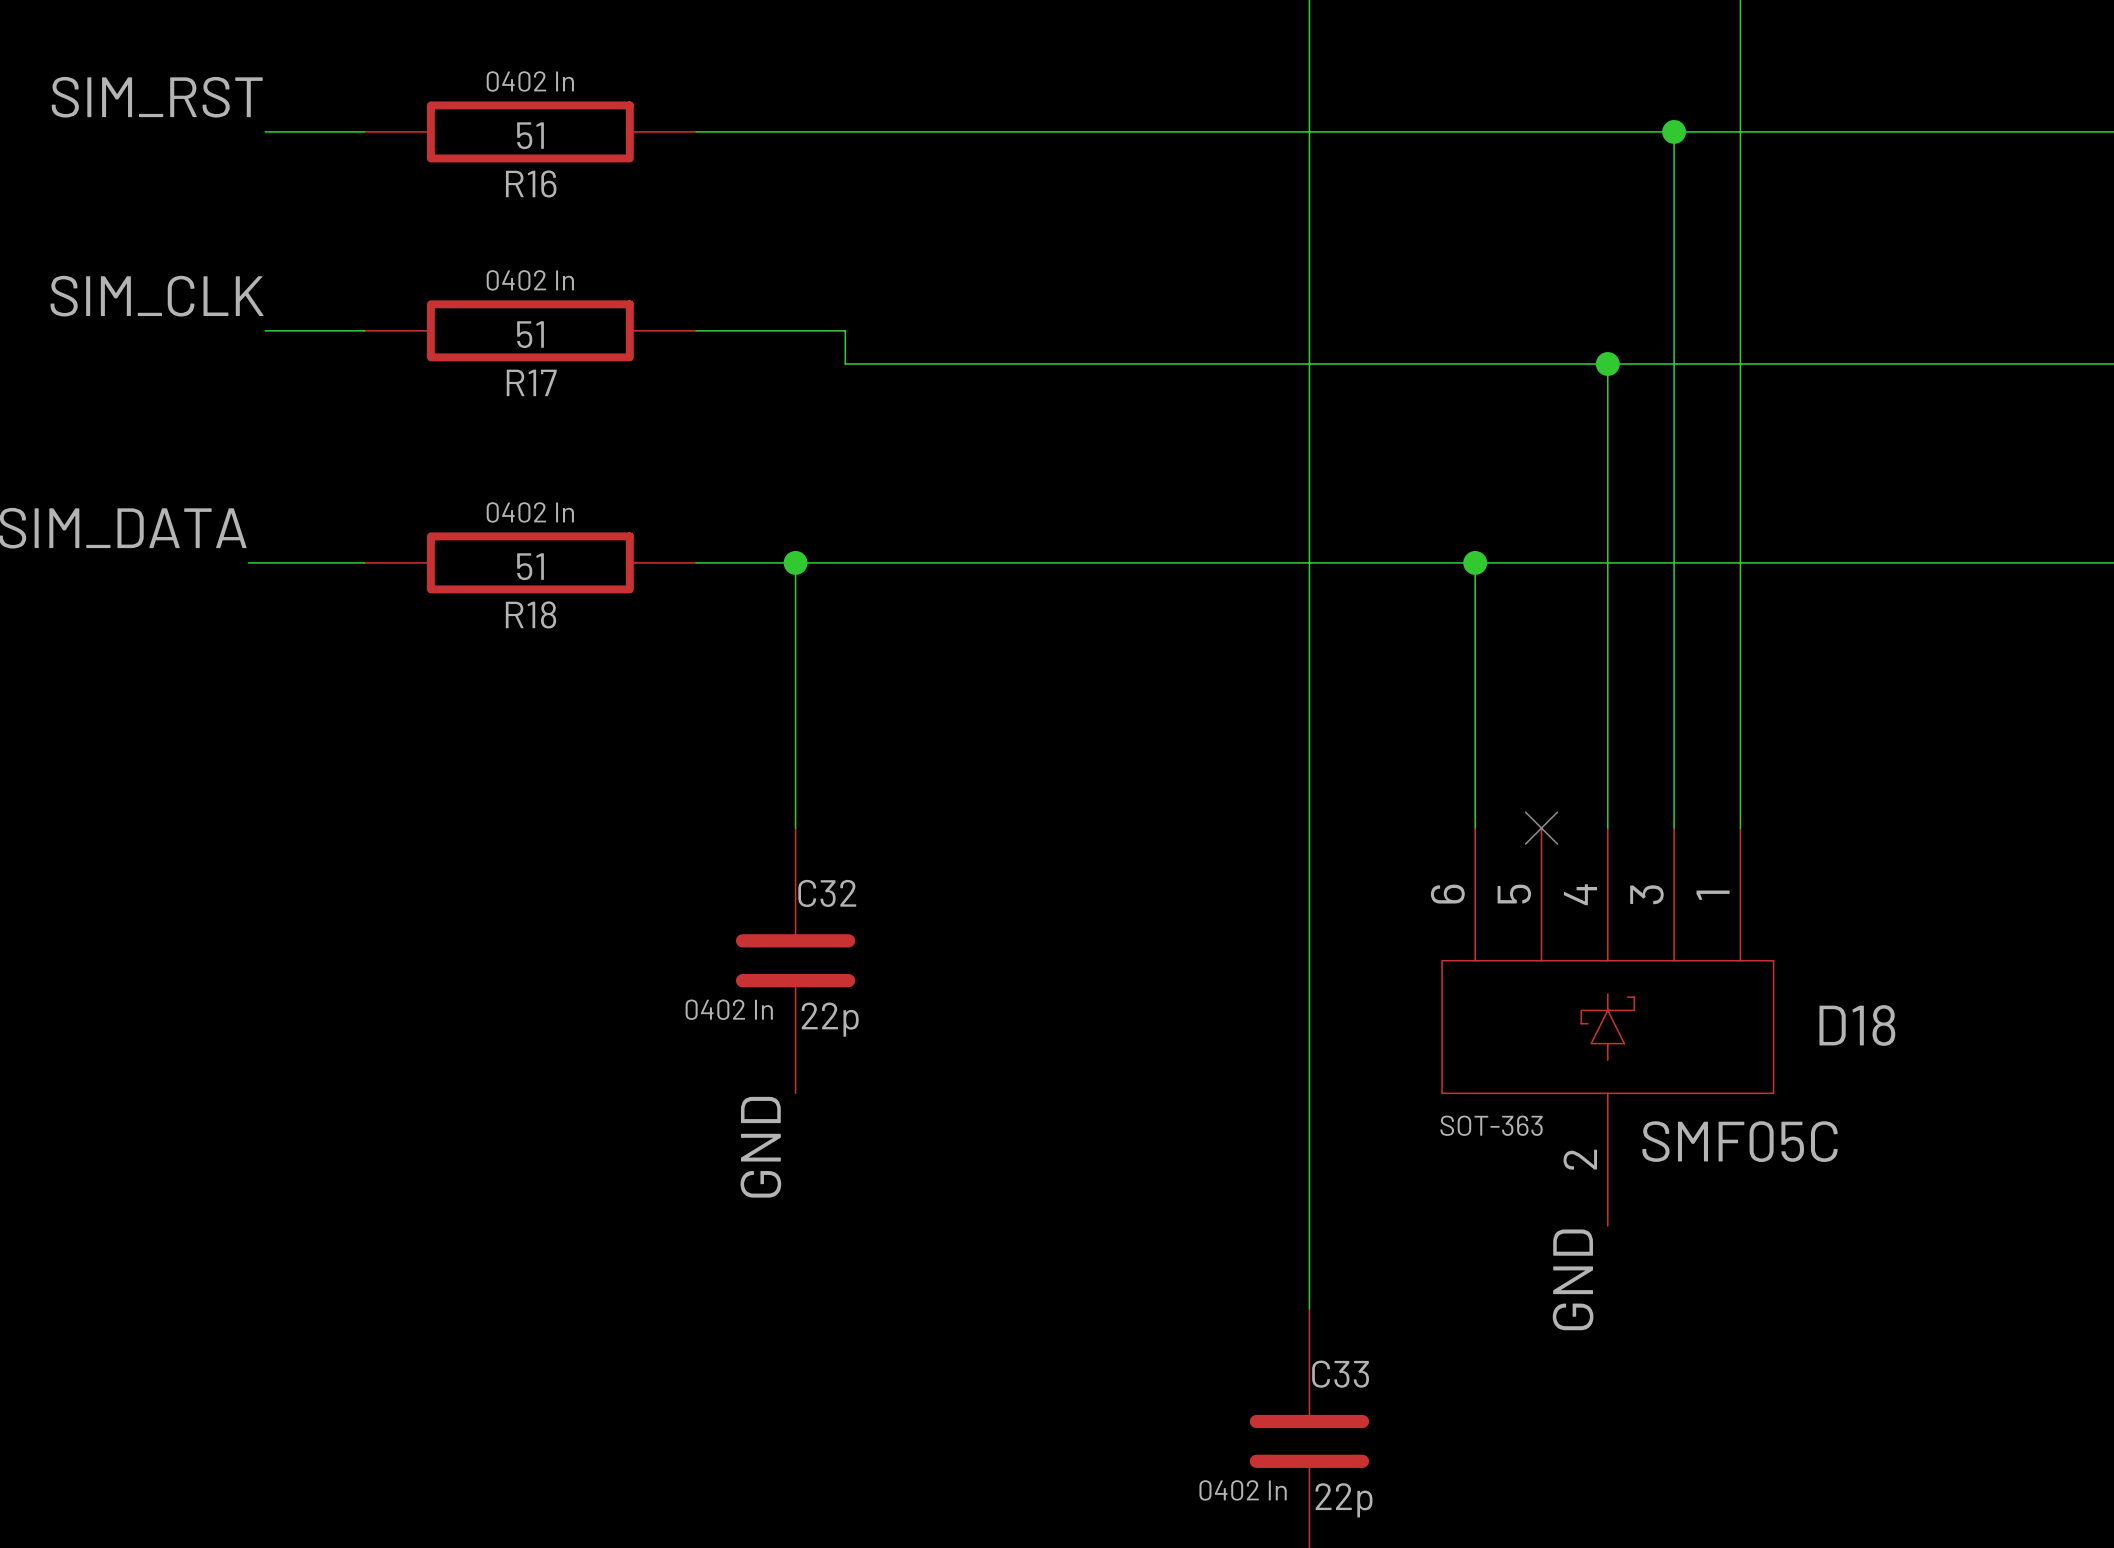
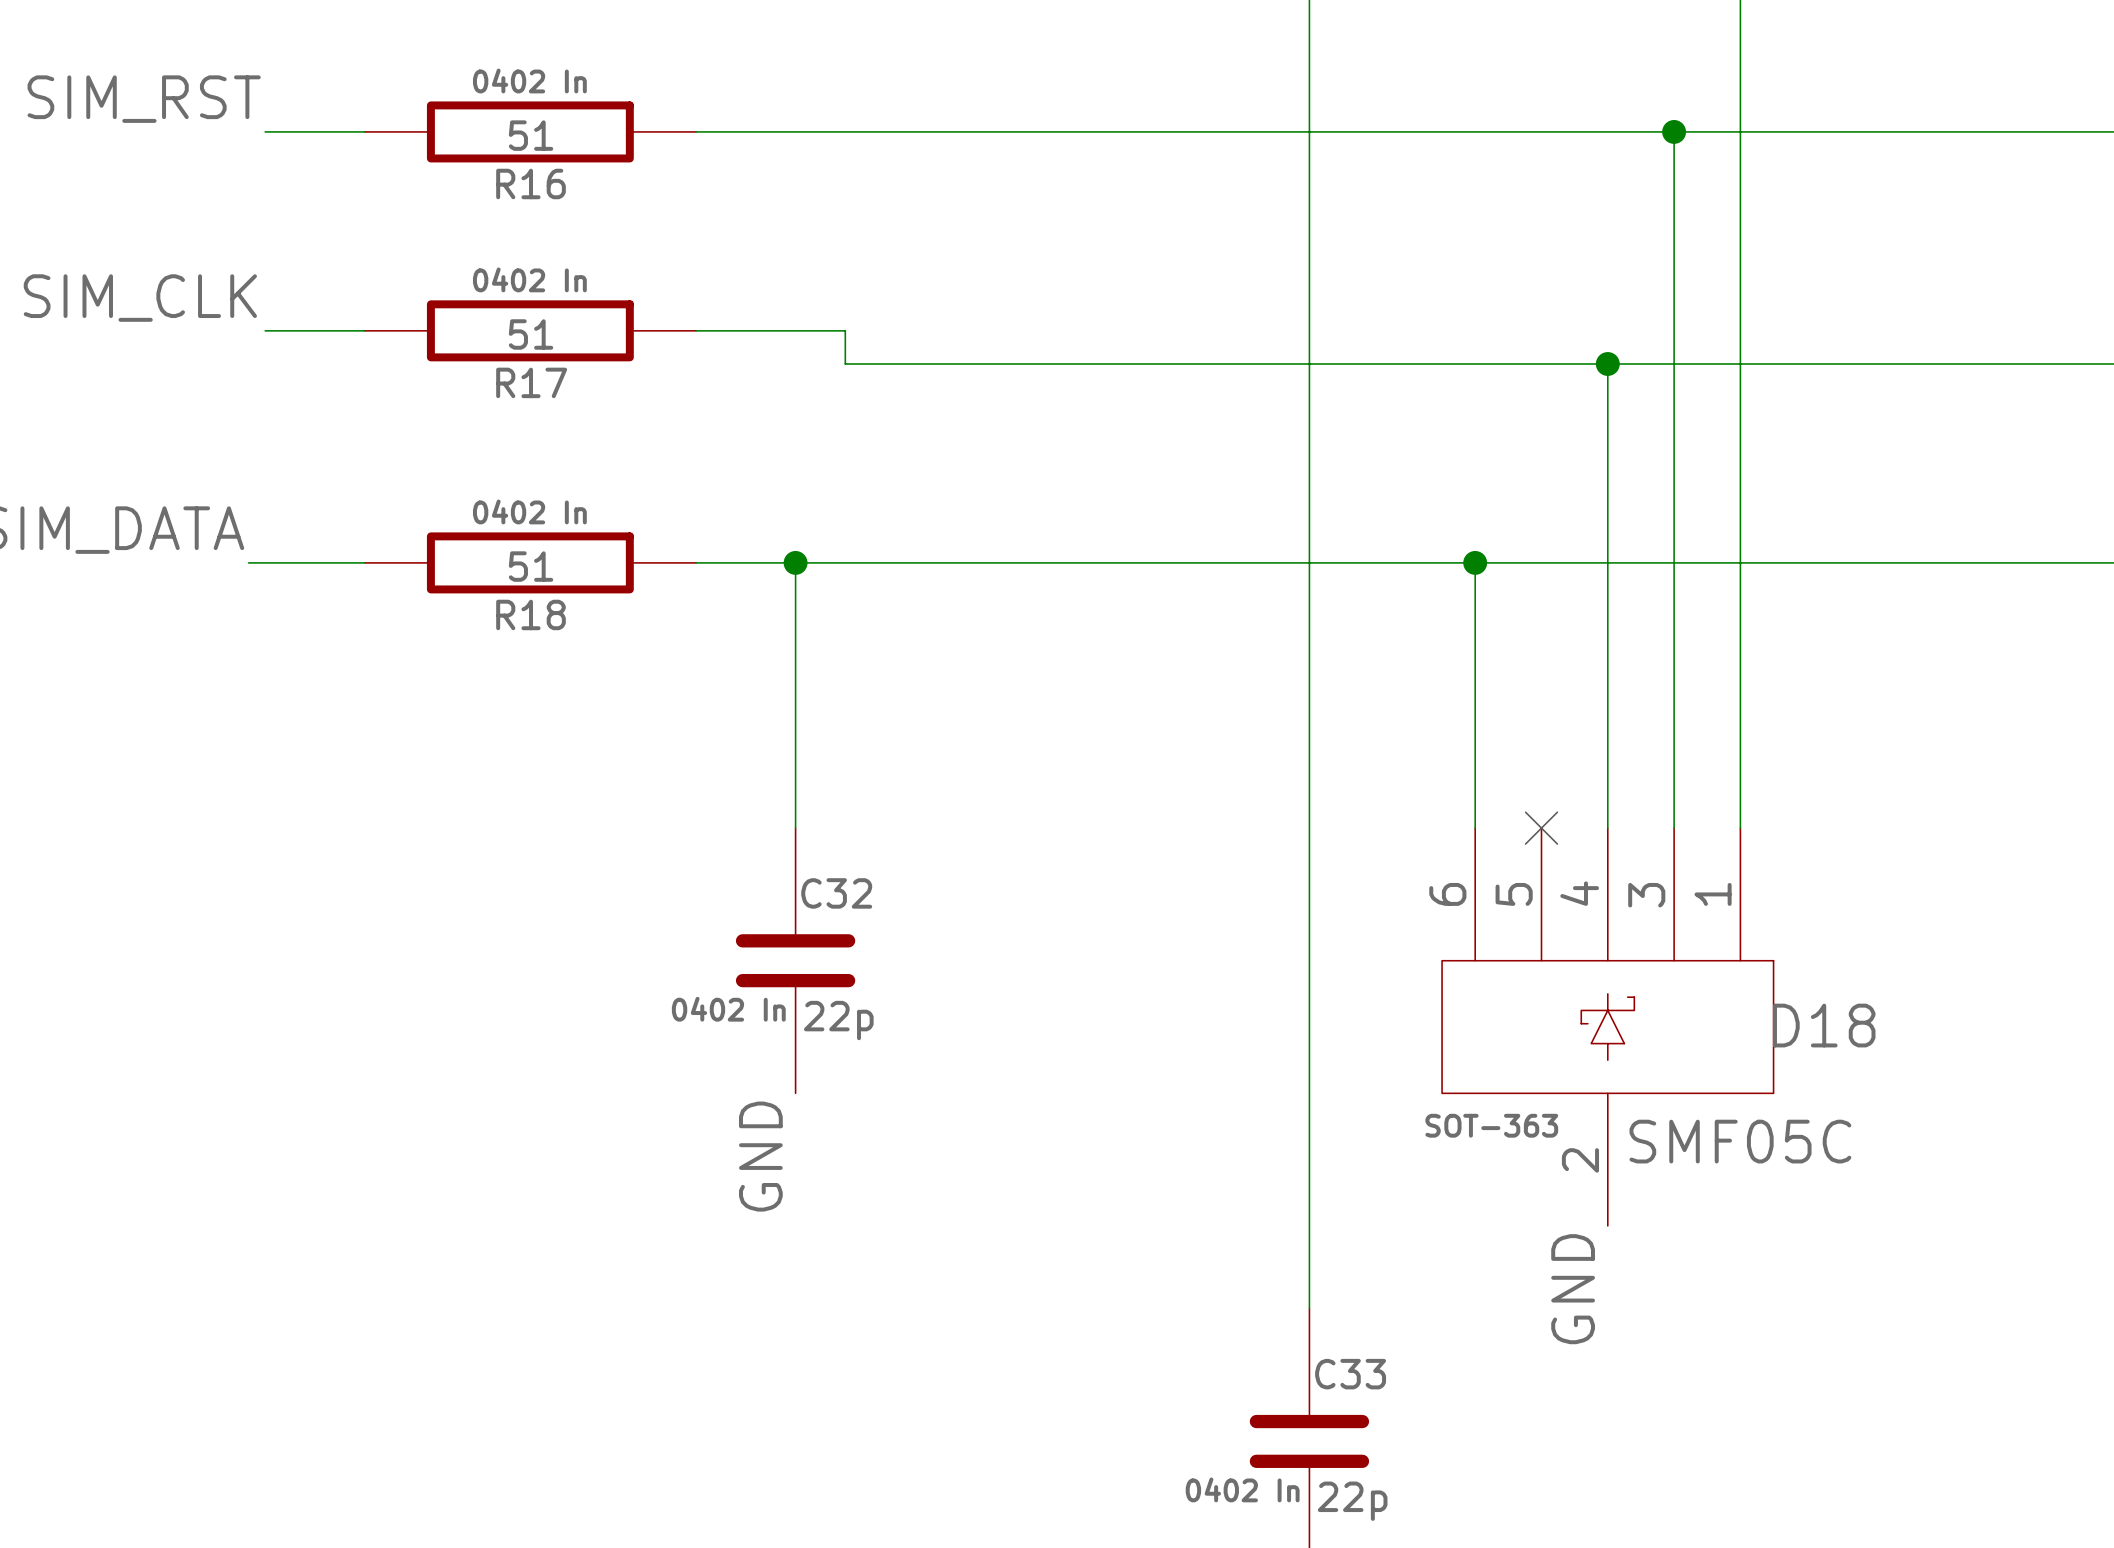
D18 name position: D18 (1857, 1025) -> D18 (1824, 1025)

